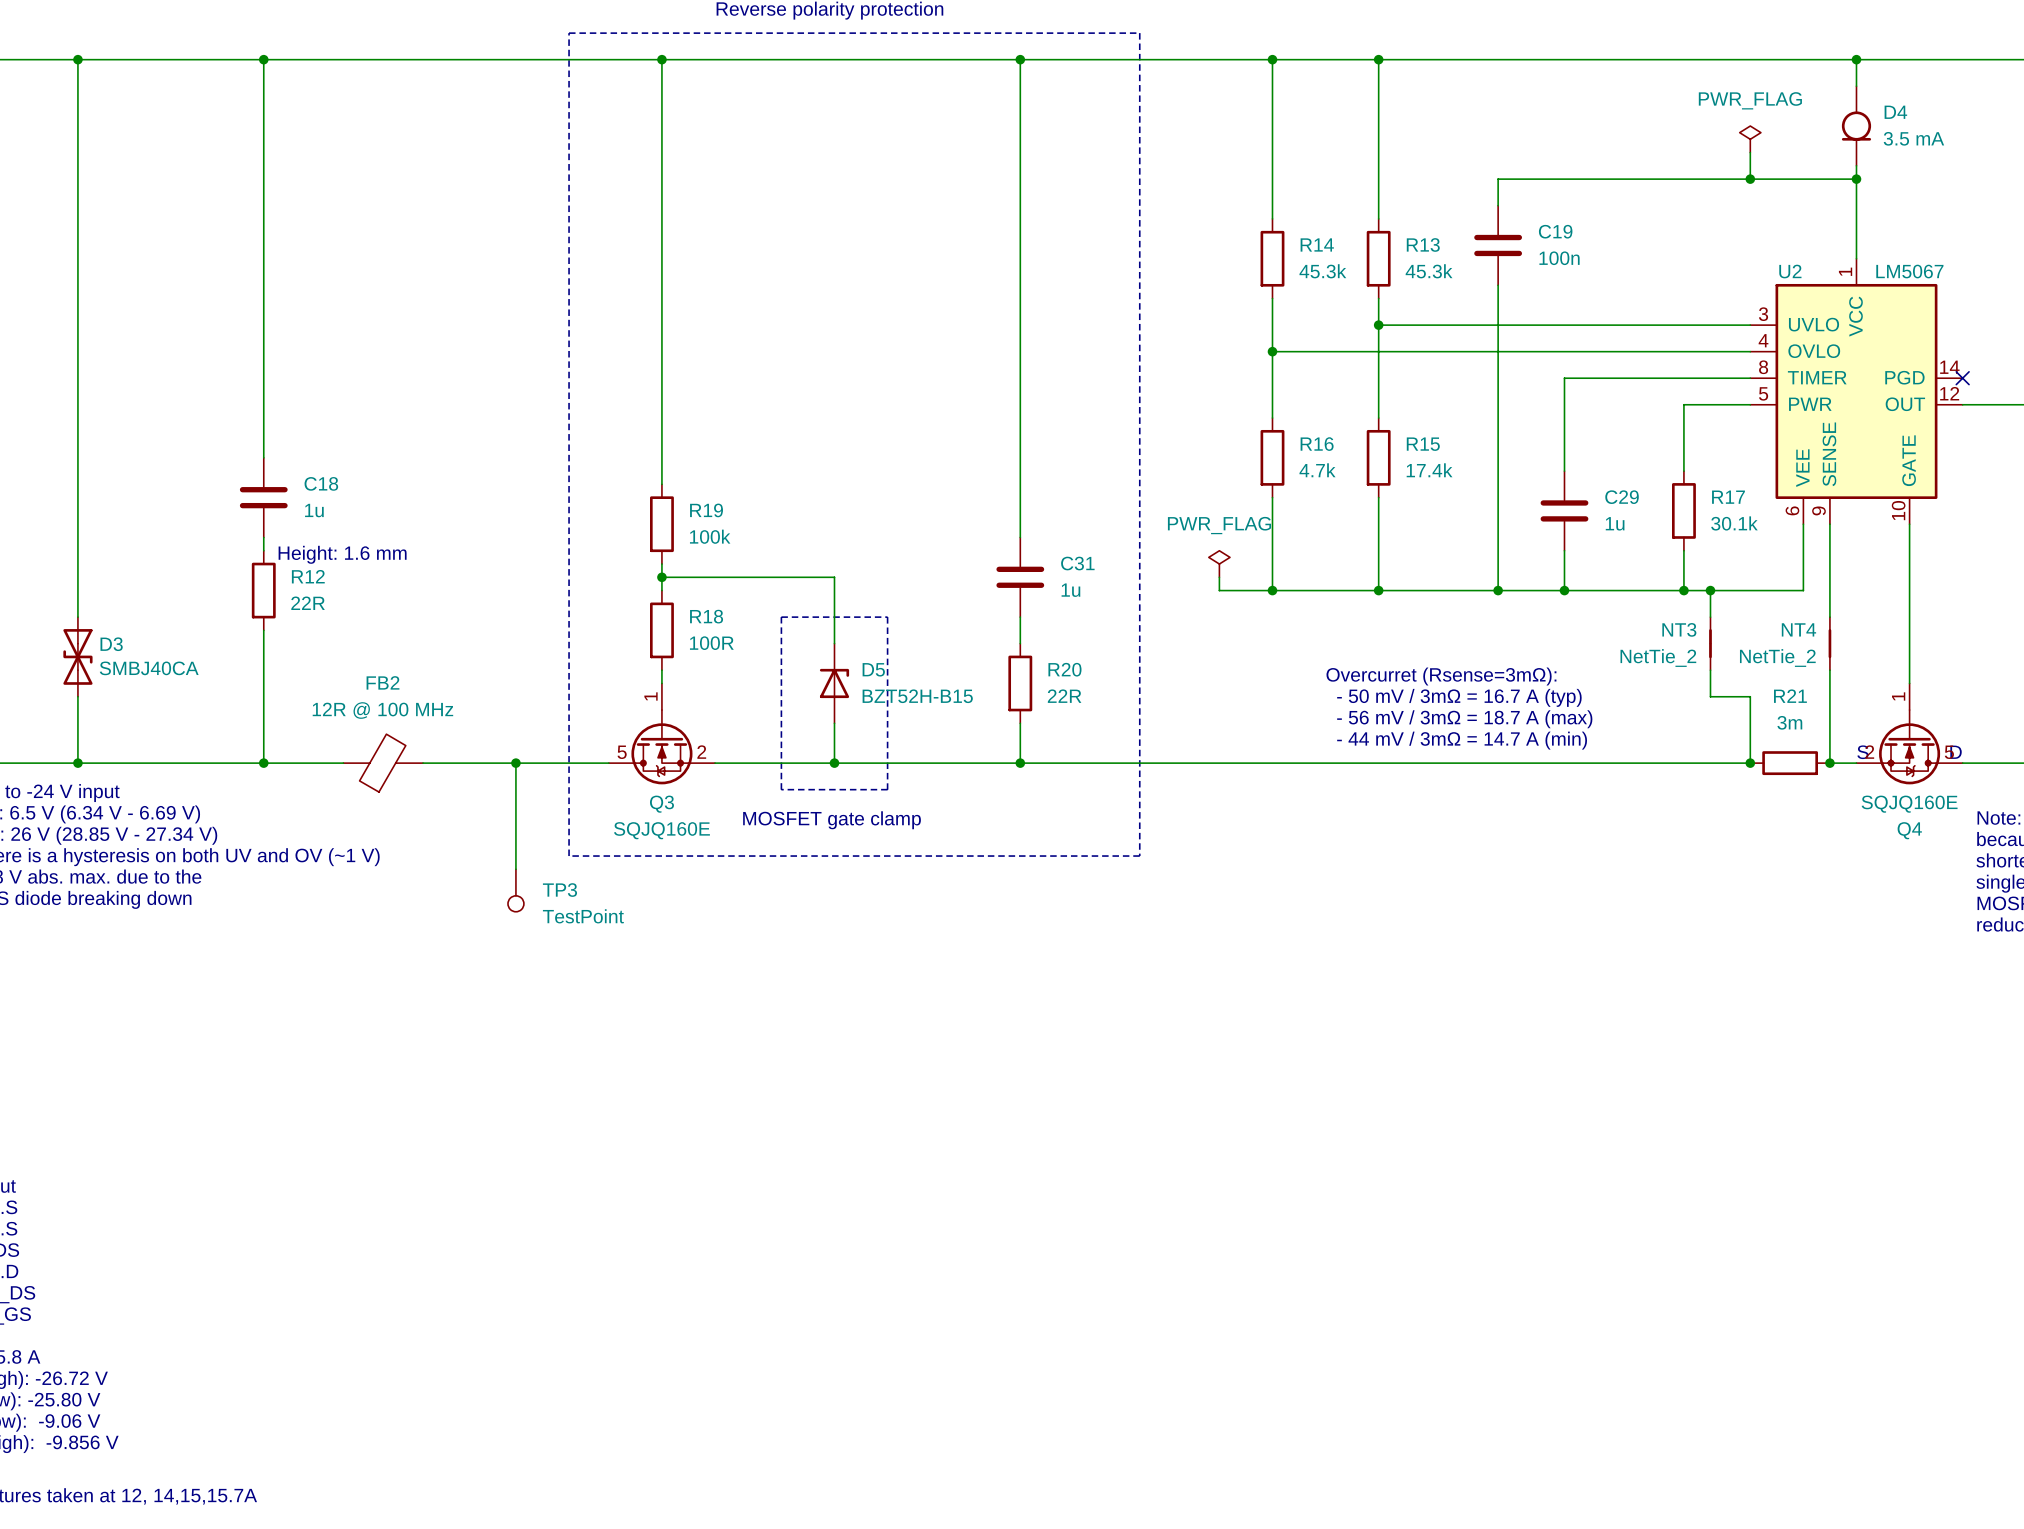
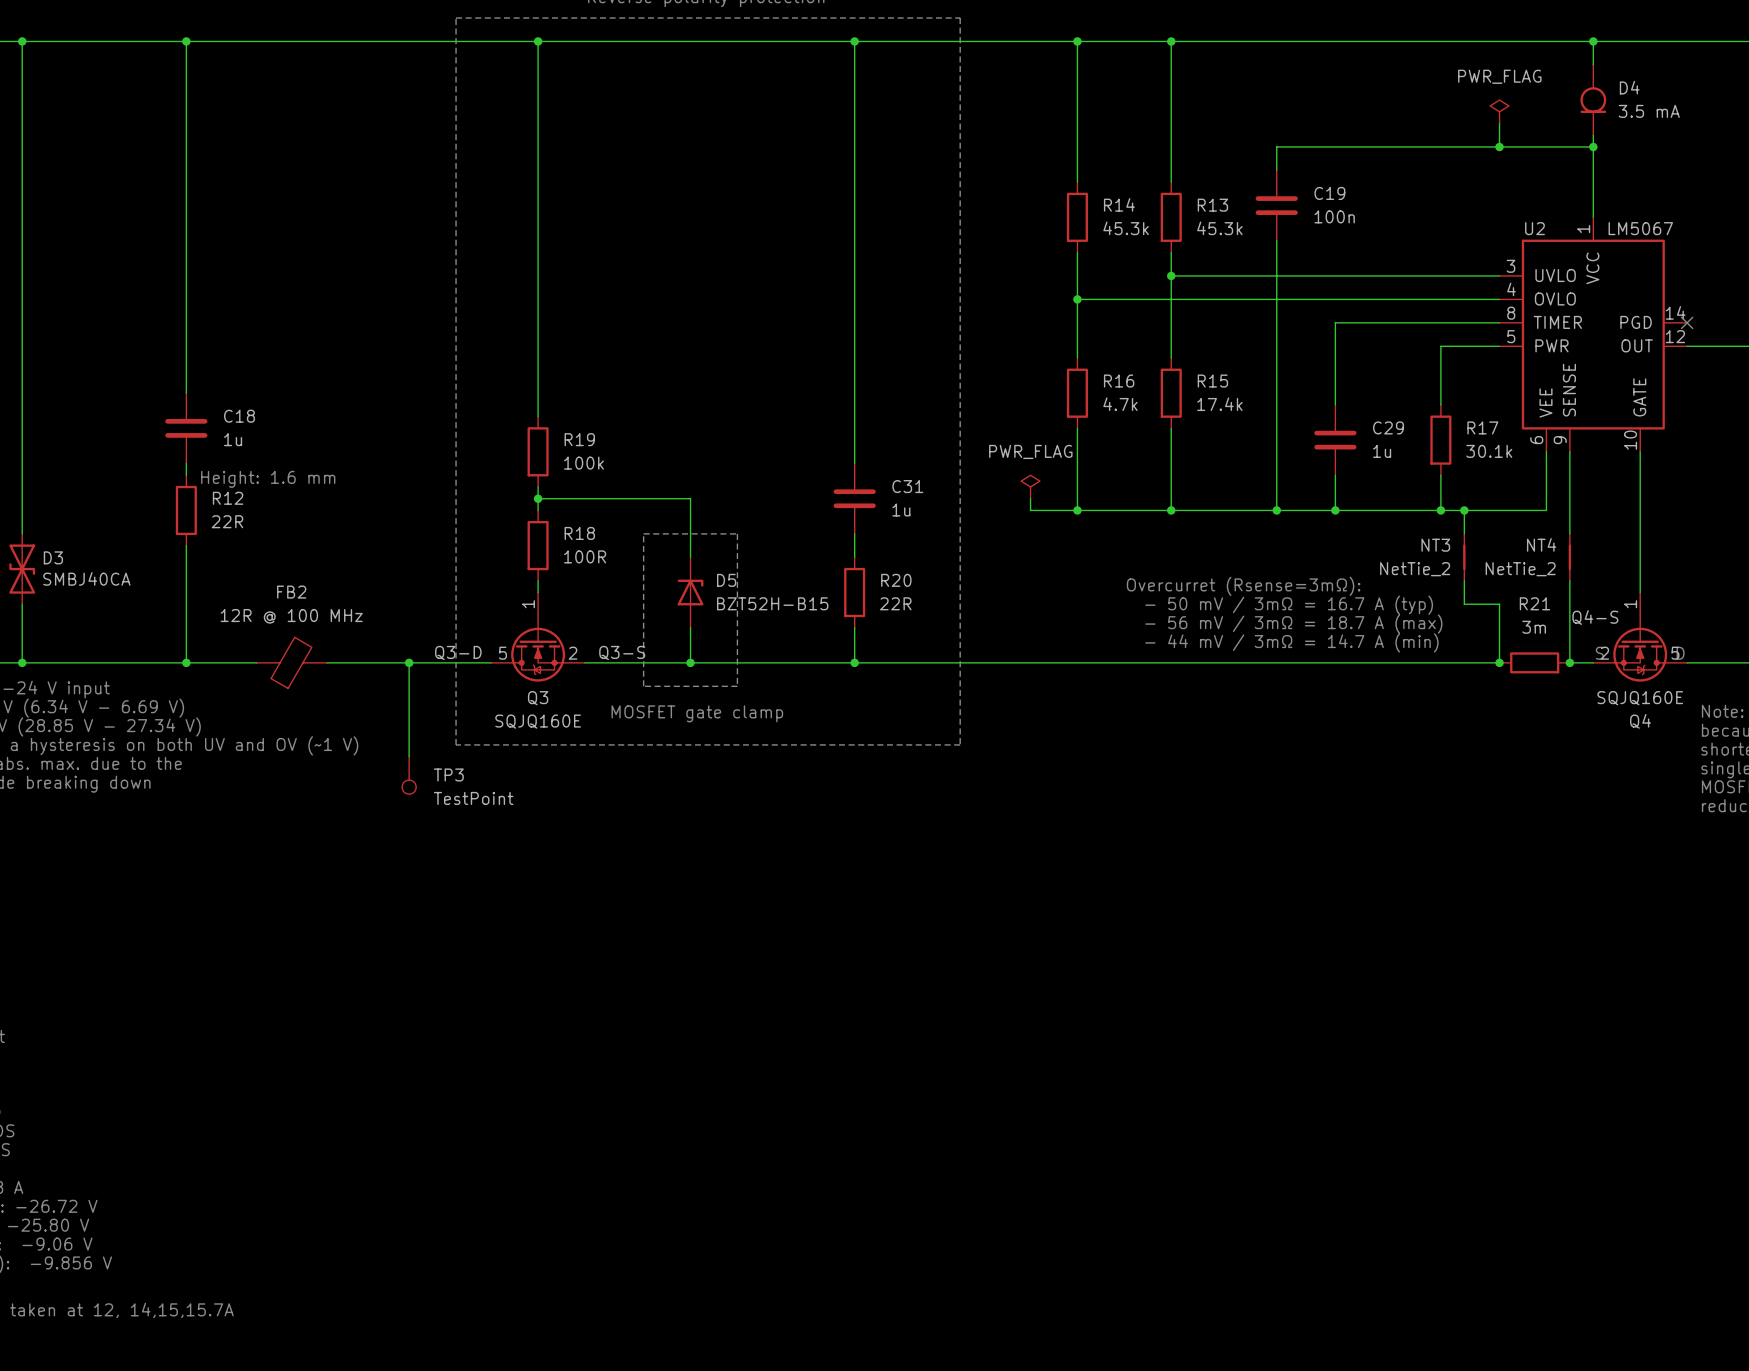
label: none -> Q4-S (1595, 617)
label: none -> Q3-D (458, 652)
label: none -> Q3-S (622, 652)

